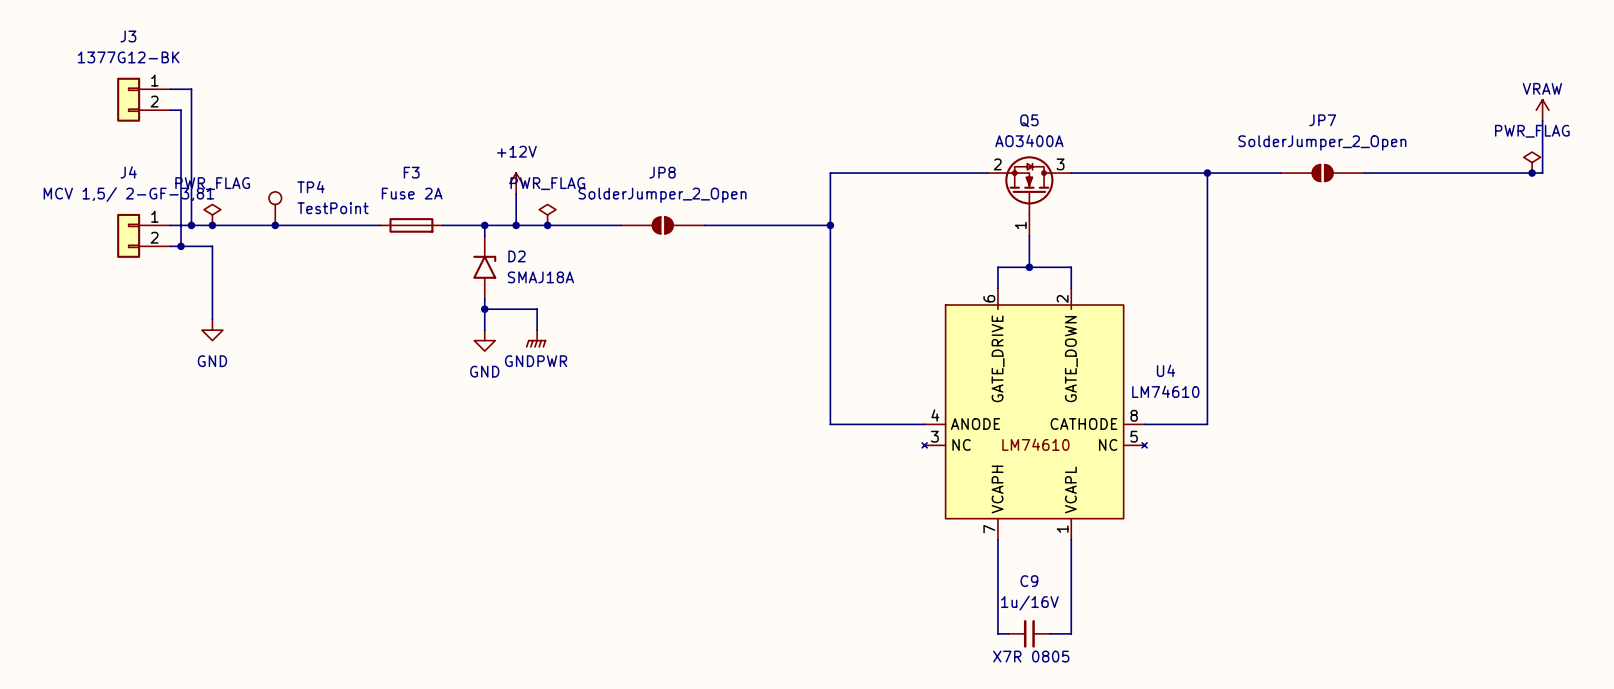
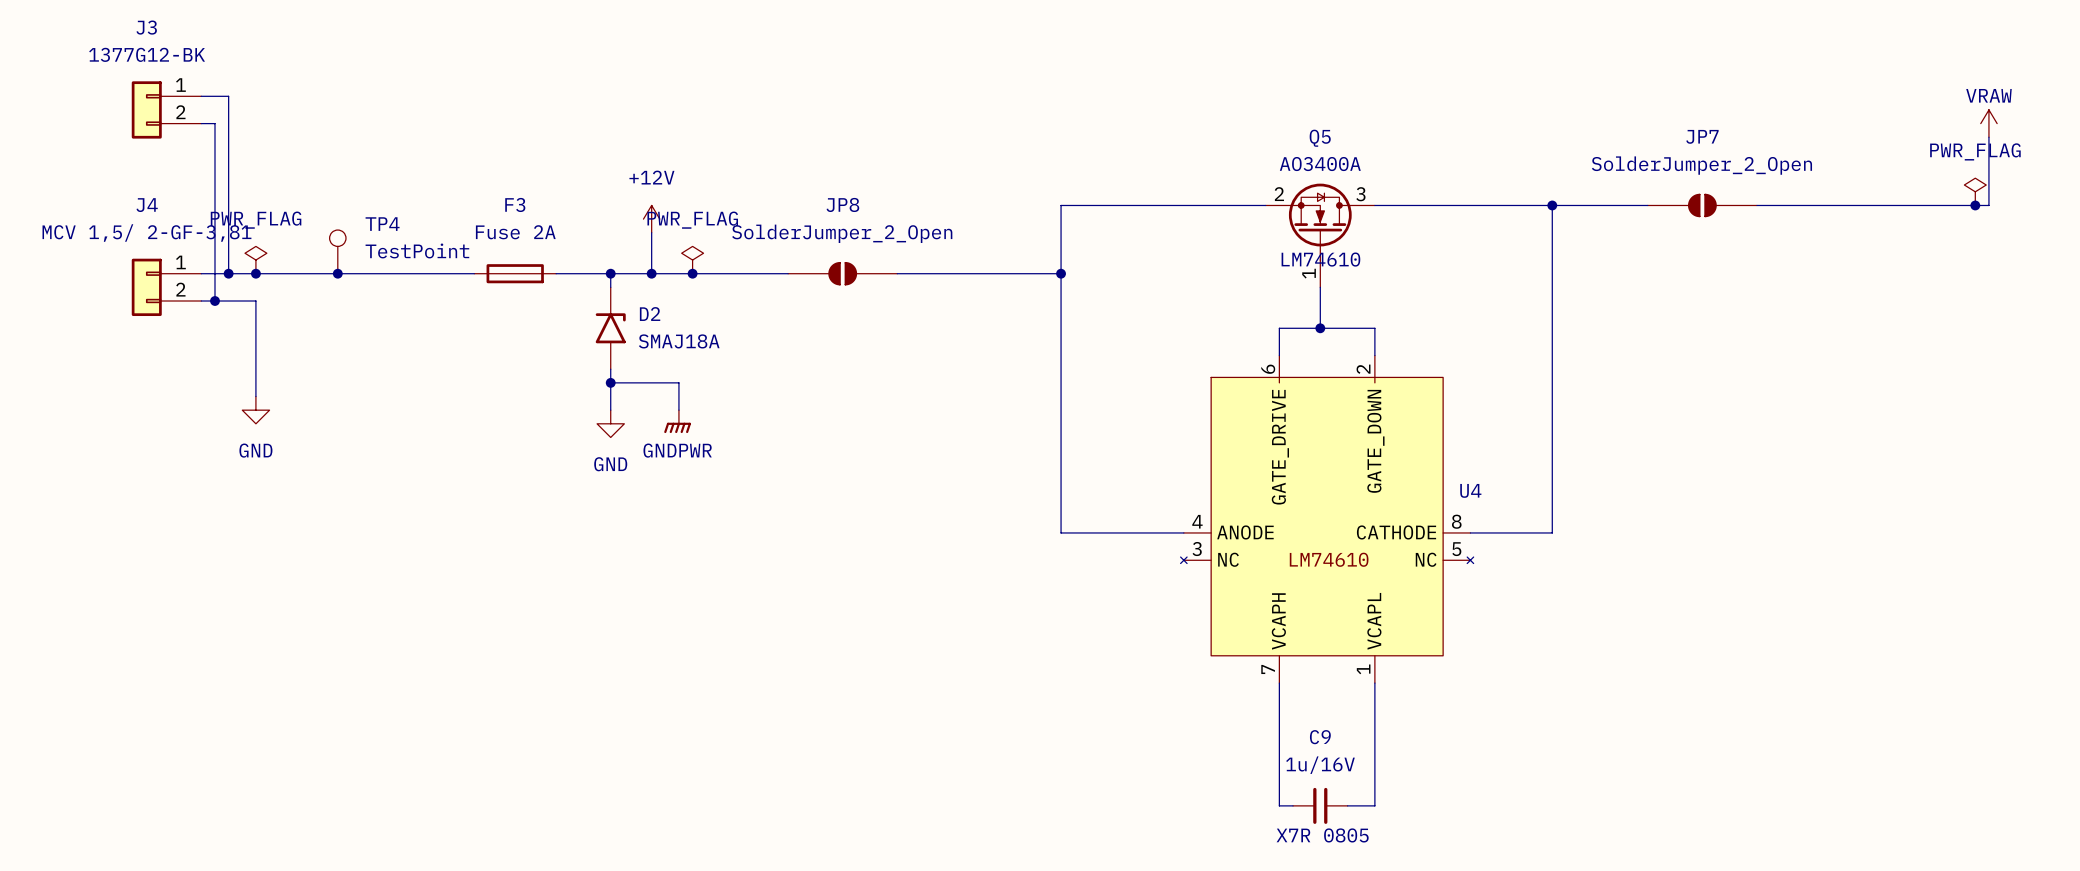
U4 name position: U4 (1166, 370) -> U4 (1470, 490)
U4 value position: LM74610 (1165, 391) -> LM74610 (1320, 259)

